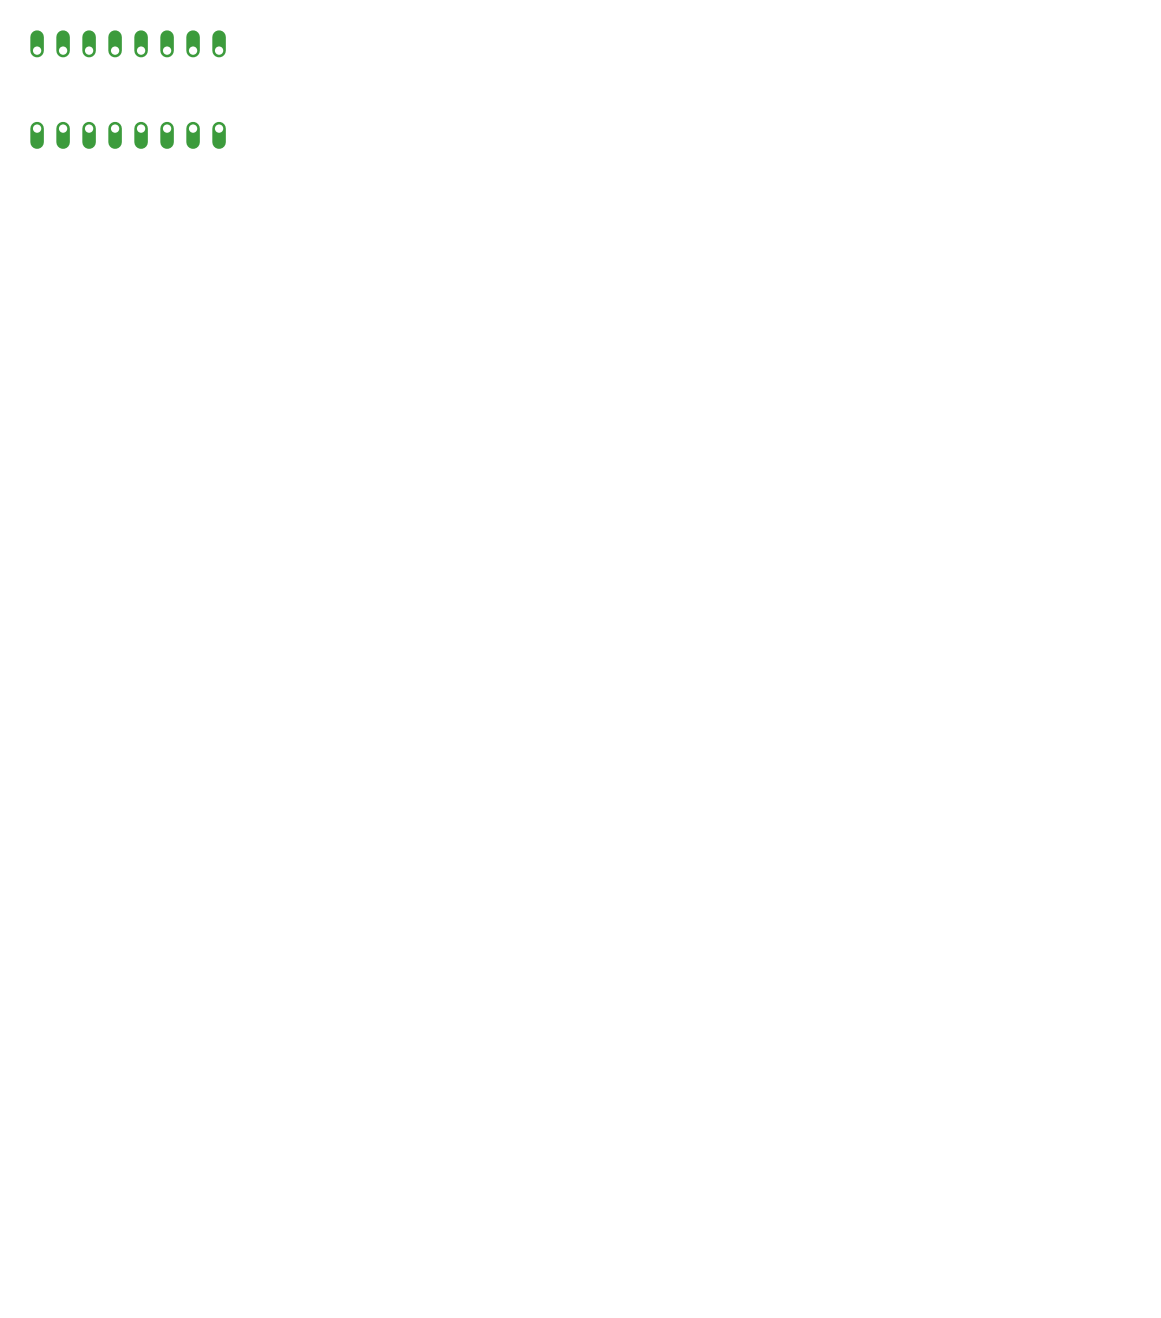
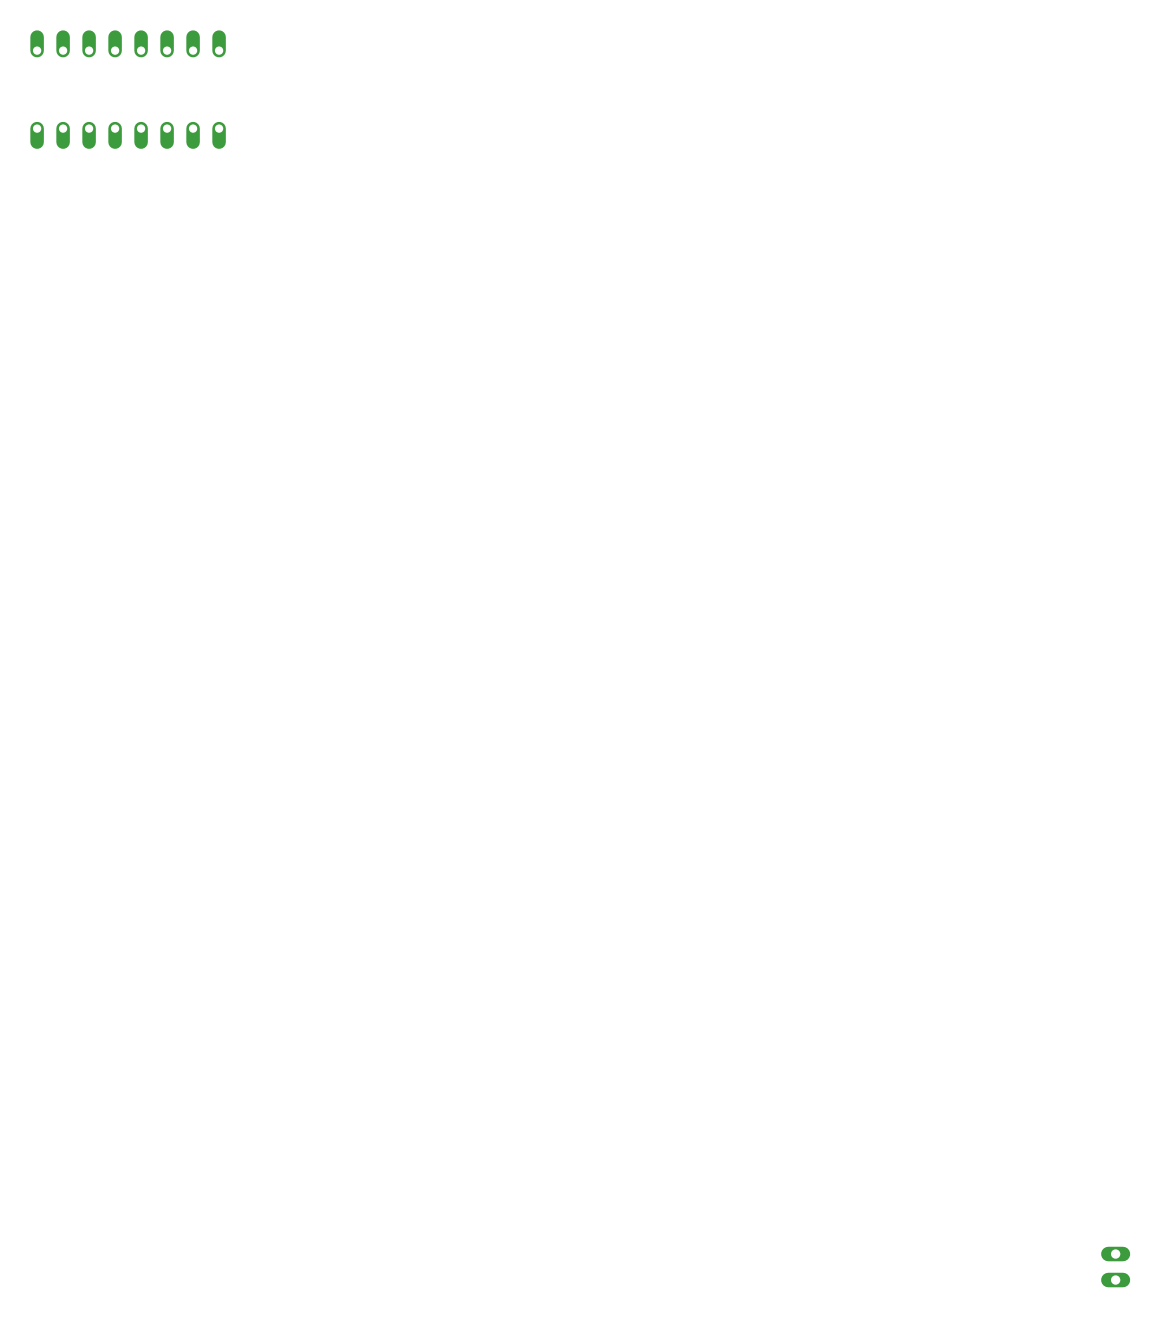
part: none -> (1115, 1267)

